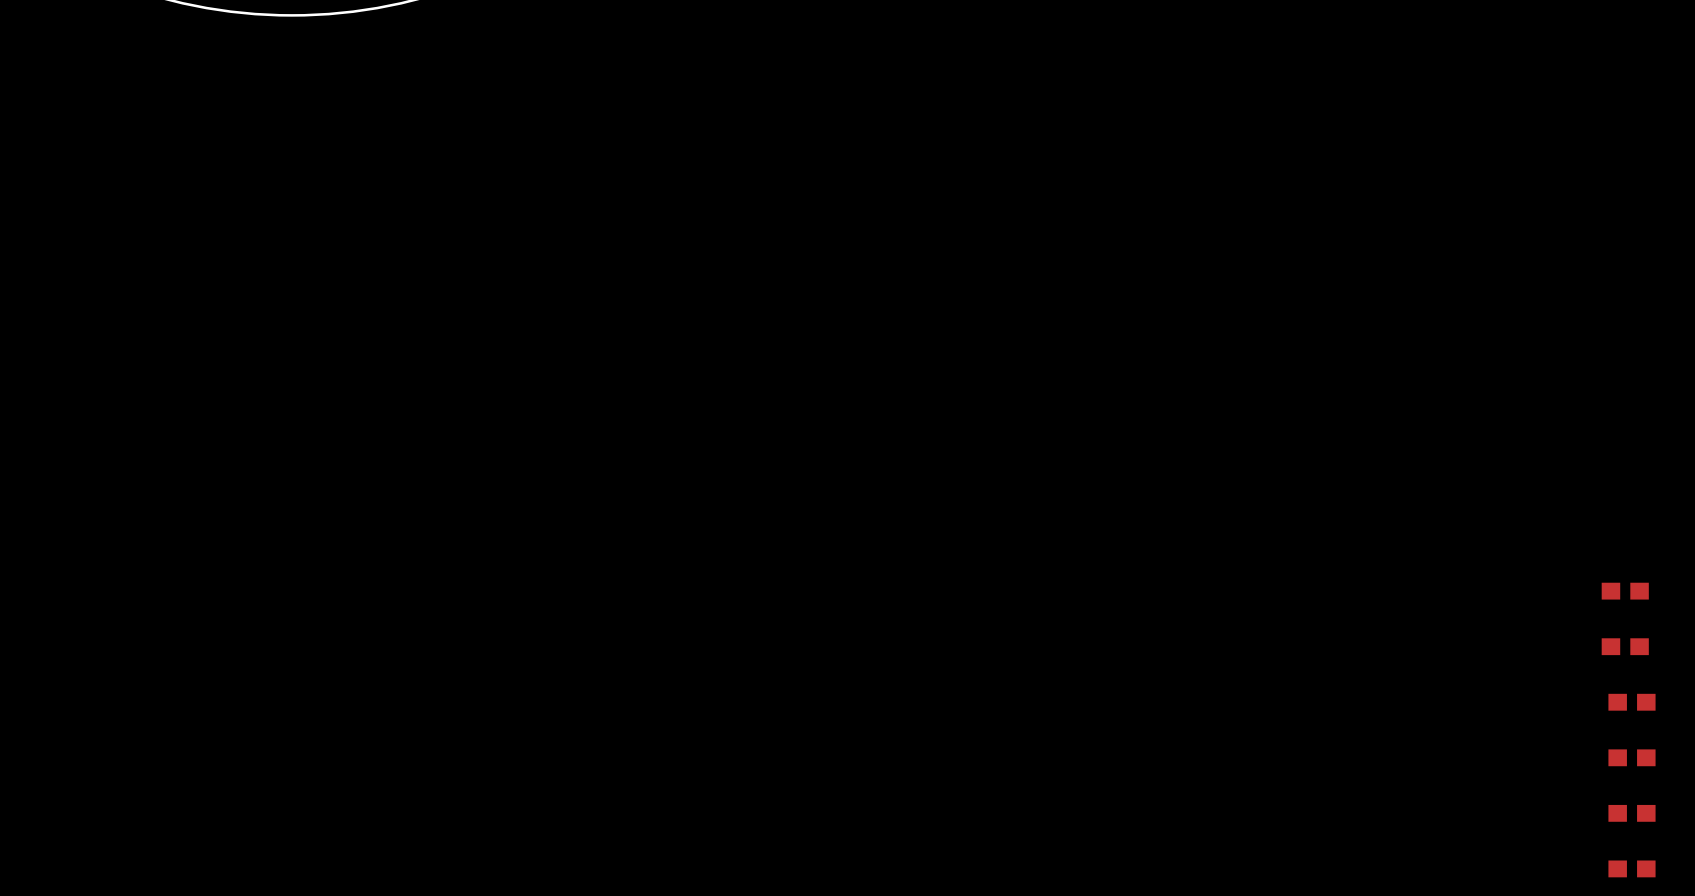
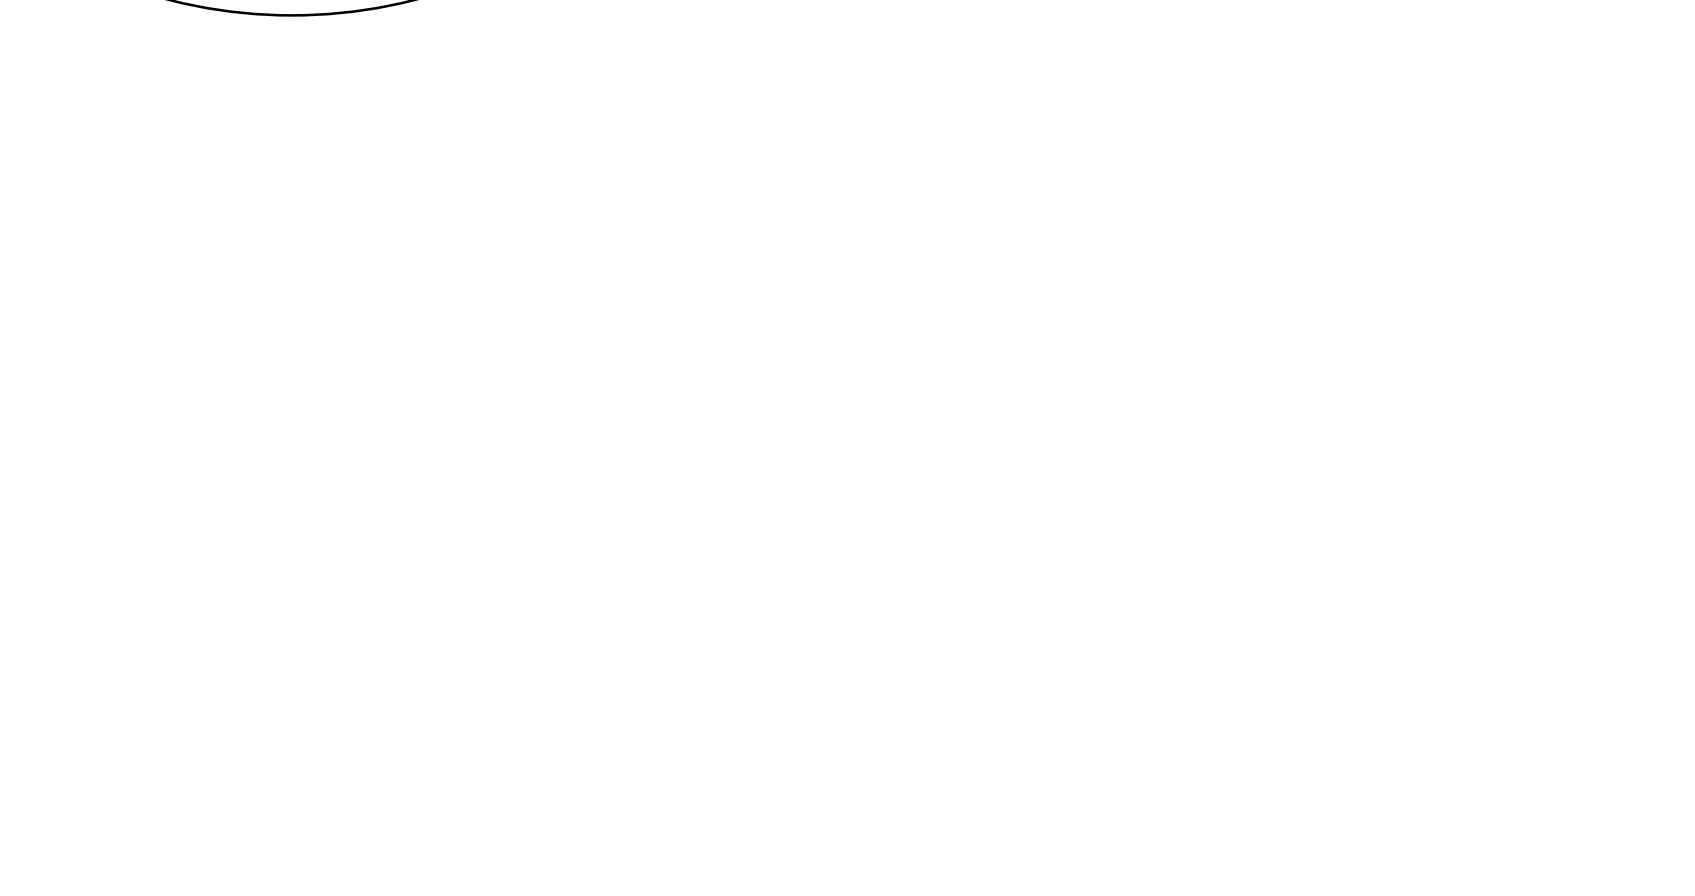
part: (1625, 591) -> none
part: (1625, 646) -> none
part: (1631, 702) -> none
part: (1631, 757) -> none
part: (1631, 813) -> none
part: (1631, 868) -> none

